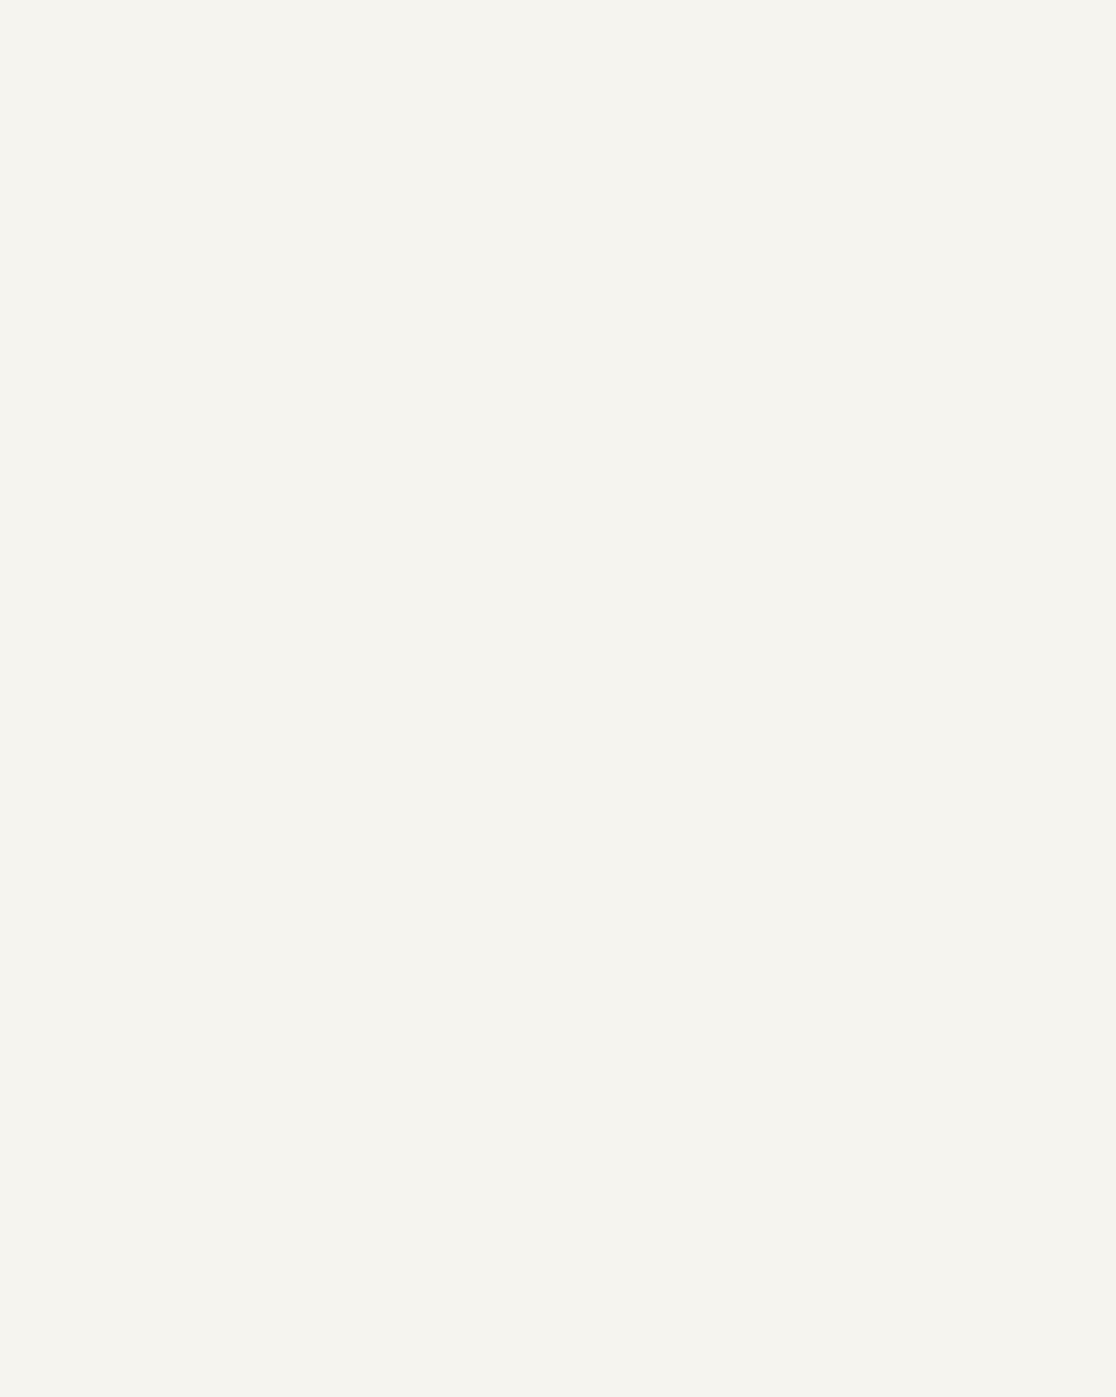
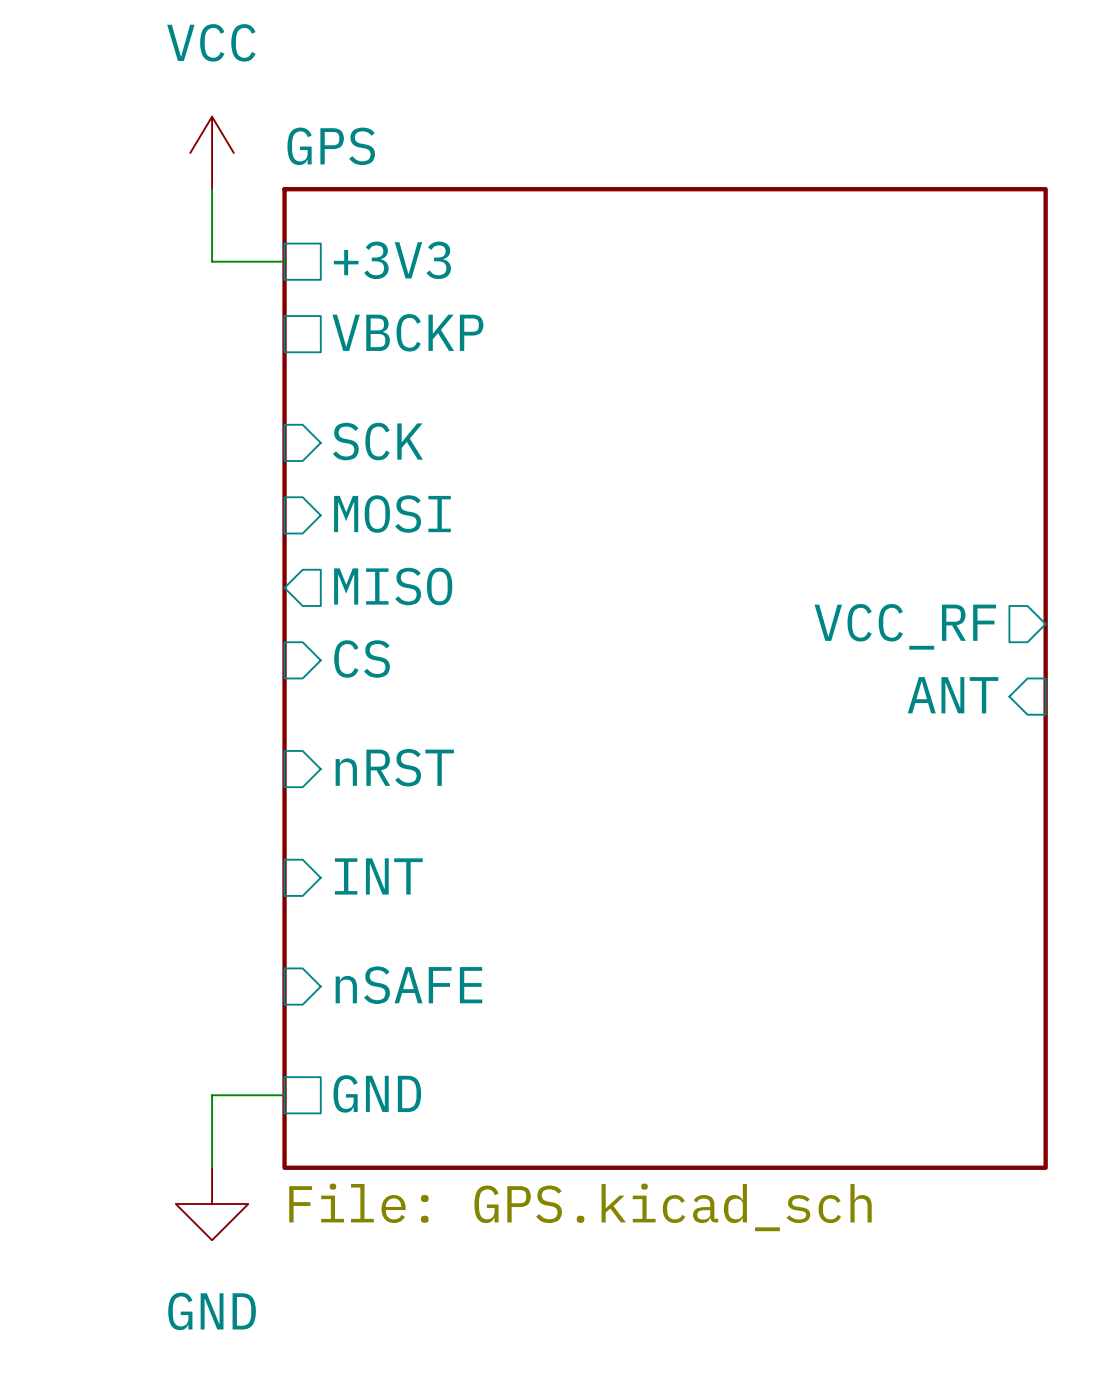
power symbol: none -> VCC (212, 152)
wire: none -> (212, 189) (212, 261) (284, 261)
sheet pin: none -> +3V3 (392, 260)
sheet pin: none -> VBCKP (407, 332)
sheet pin: none -> SCK (377, 441)
sheet pin: none -> MOSI (392, 514)
sheet pin: none -> MISO (393, 586)
sheet pin: none -> VCC_RF (905, 626)
sheet pin: none -> CS (362, 659)
sheet GPS: none -> File: GPS.kicad_sch (665, 678)
sheet pin: none -> ANT (953, 695)
sheet pin: none -> nRST (394, 767)
sheet pin: none -> INT (378, 876)
sheet pin: none -> nSAFE (408, 985)
sheet pin: none -> GND (377, 1093)
wire: none -> (284, 1095) (212, 1095) (212, 1167)
power symbol: none -> GND (212, 1204)

